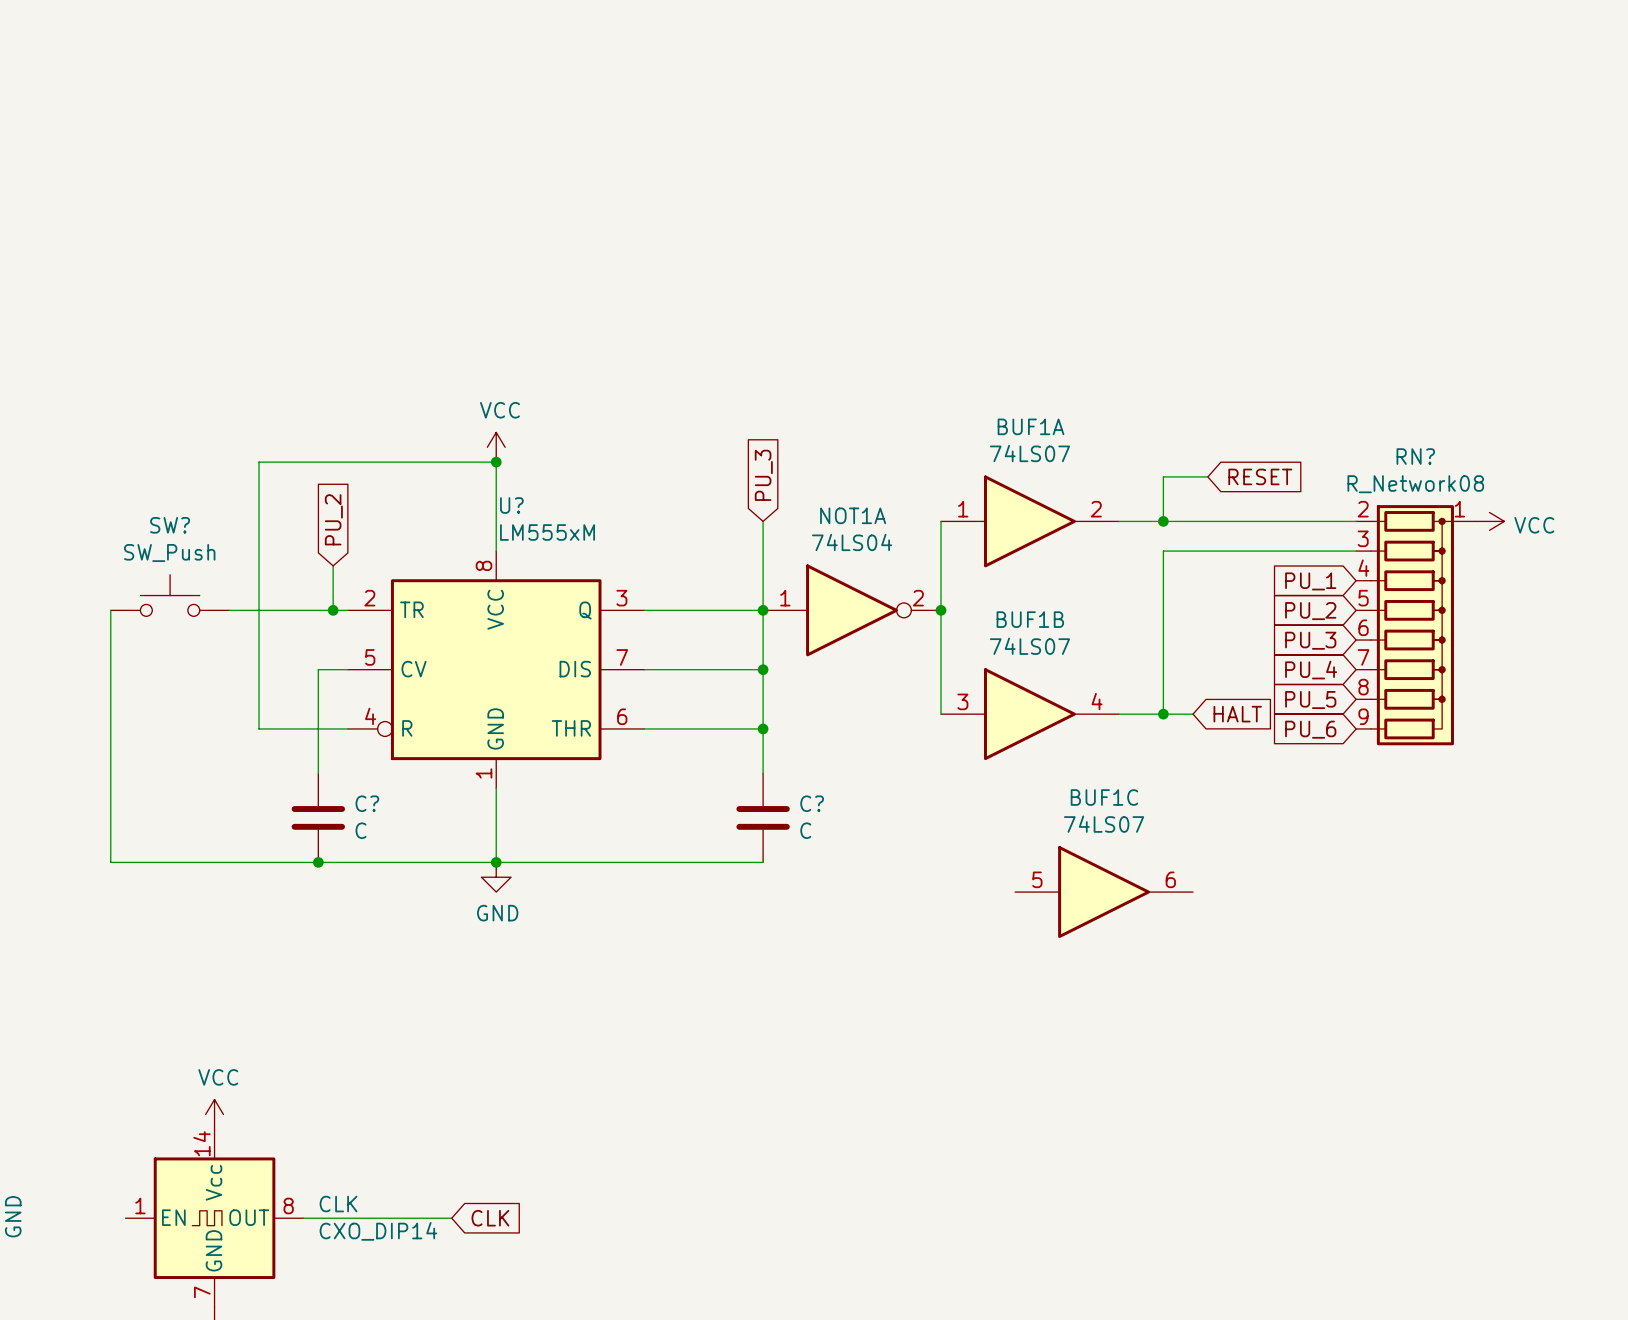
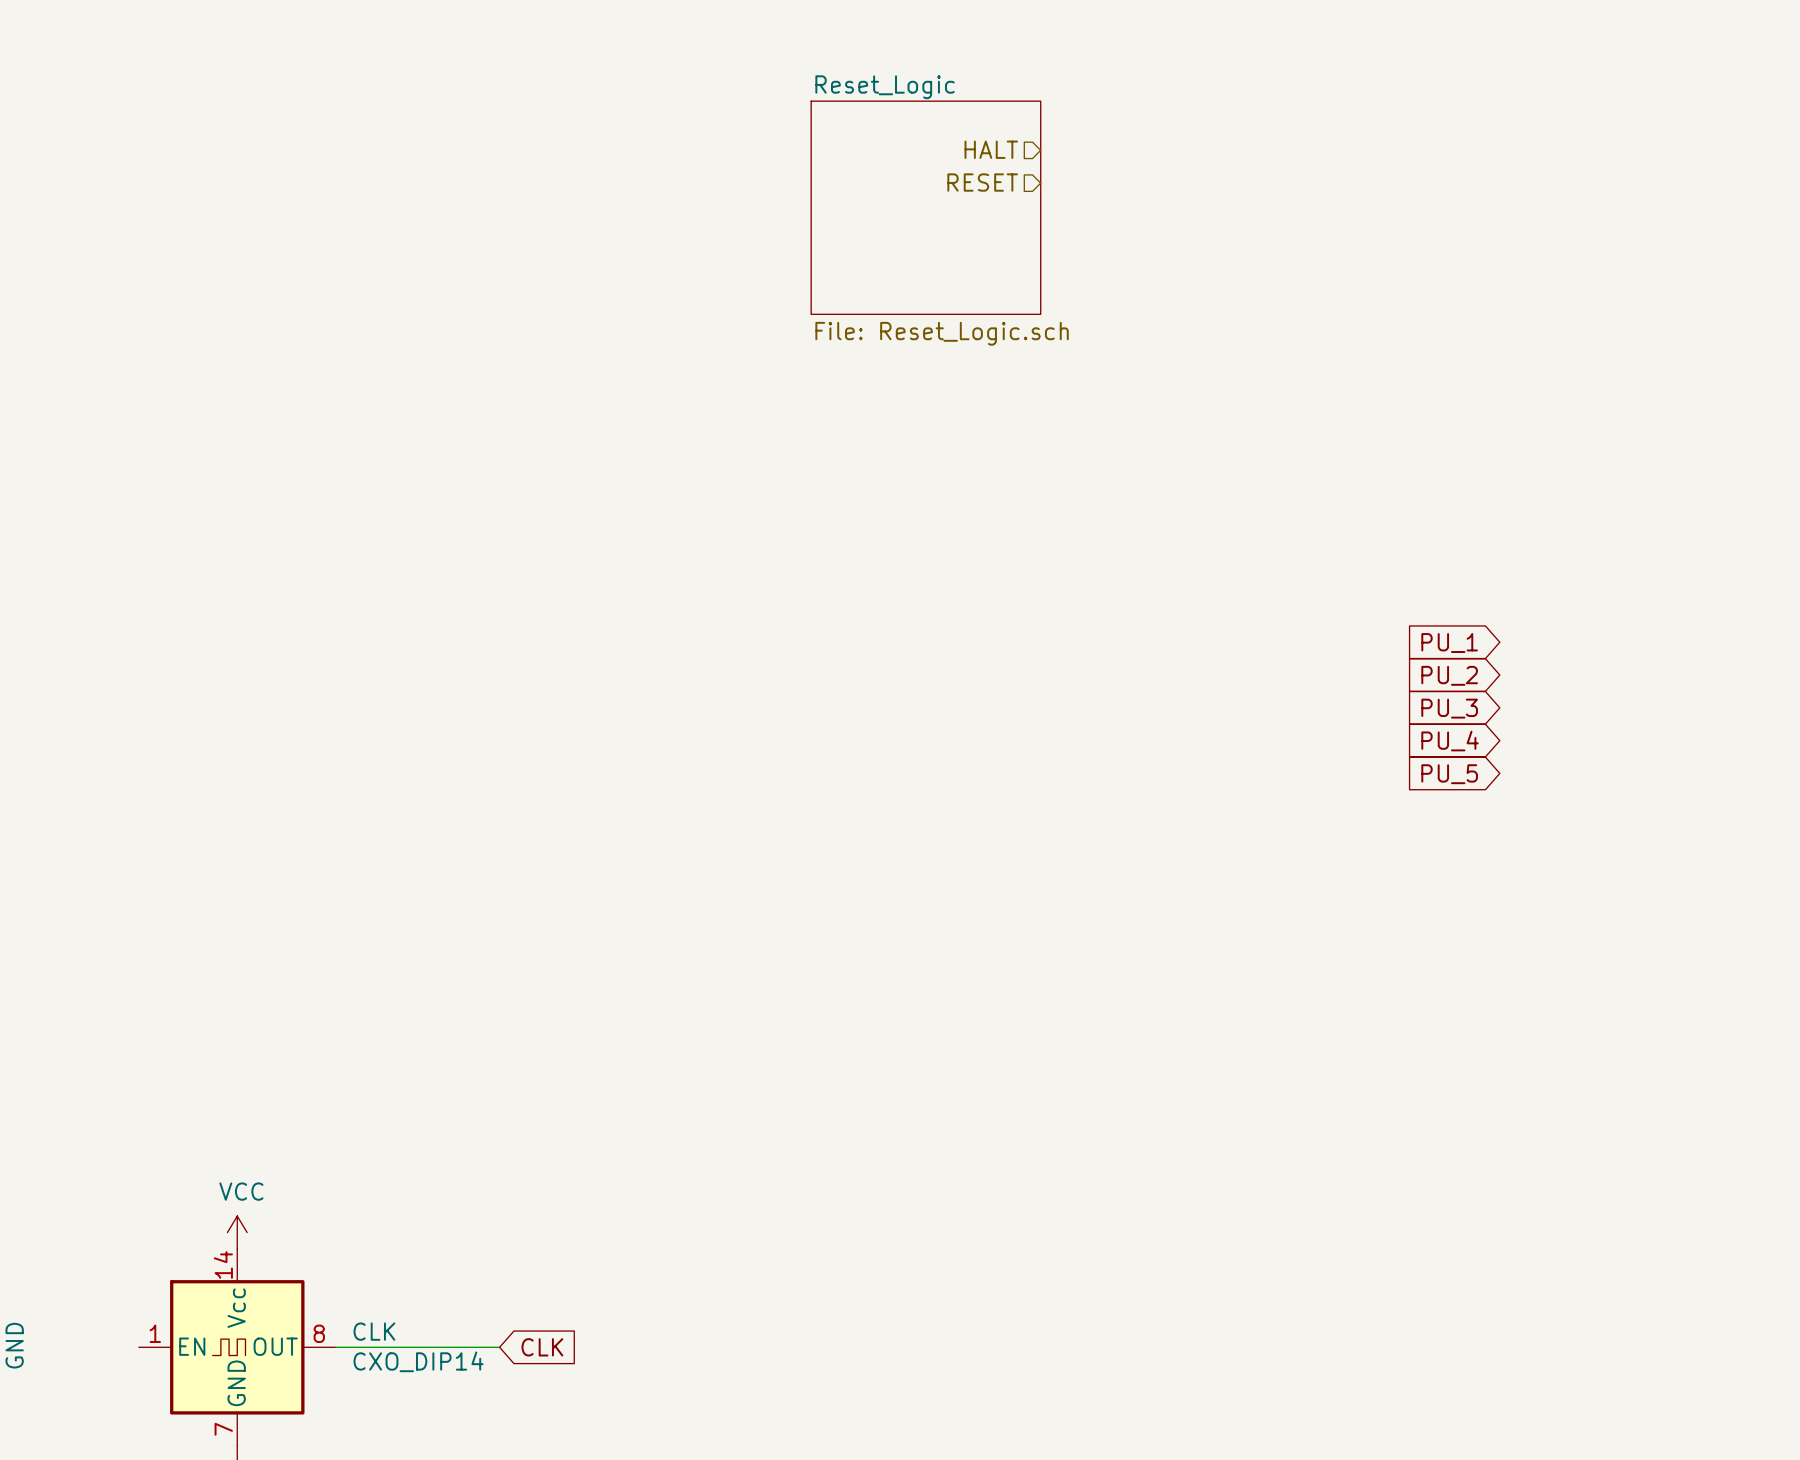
hierarchical label: none -> HALT (991, 149)
hierarchical label: none -> RESET (982, 182)
sheet Reset_Logic: none -> File: Reset_Logic.sch (925, 207)
power symbol: VCC (496, 447) -> none
junction: (496, 462) -> none
global label: PU_3 (763, 475) -> none
wire: (1207, 476) (1163, 476) (1163, 521) -> none
global label: RESET (1260, 476) -> none
global label: PU_2 (333, 519) -> none
wire: (763, 521) (763, 773) -> none
wire: (941, 521) (941, 714) -> none
BUF1A: 74LS07 (1029, 521) -> none
wire: (1118, 521) (1356, 521) -> none
junction: (1163, 521) -> none
power symbol: VCC (1489, 521) -> none
wire: (496, 551) (496, 462) (259, 462) (259, 728) (347, 728) -> none
wire: (1356, 551) (1163, 551) (1163, 714) -> none
wire: (333, 565) (333, 610) -> none
SW?: SW_Push (170, 595) -> none
wire: (110, 610) (110, 862) (763, 862) -> none
wire: (229, 610) (347, 610) -> none
junction: (333, 610) -> none
wire: (644, 610) (763, 610) -> none
junction: (763, 610) -> none
NOT1A: 74LS04 (852, 610) -> none
junction: (941, 610) -> none
RN?: R_Network08 (1415, 625) -> none
wire: (347, 669) (318, 669) (318, 773) -> none
U?: LM555xM (496, 669) -> none
wire: (644, 669) (763, 669) -> none
junction: (763, 669) -> none
BUF1B: 74LS07 (1029, 714) -> none
wire: (1118, 714) (1193, 714) -> none
junction: (1163, 714) -> none
global label: HALT (1237, 714) -> none
wire: (644, 728) (763, 728) -> none
junction: (763, 728) -> none
global label: PU_6 (1310, 729) -> none
wire: (496, 788) (496, 862) -> none
C?: C (318, 817) -> none
C?: C (763, 817) -> none
junction: (318, 862) -> none
junction: (496, 862) -> none
power symbol: GND (496, 877) -> none
BUF1C: 74LS07 (1104, 892) -> none

